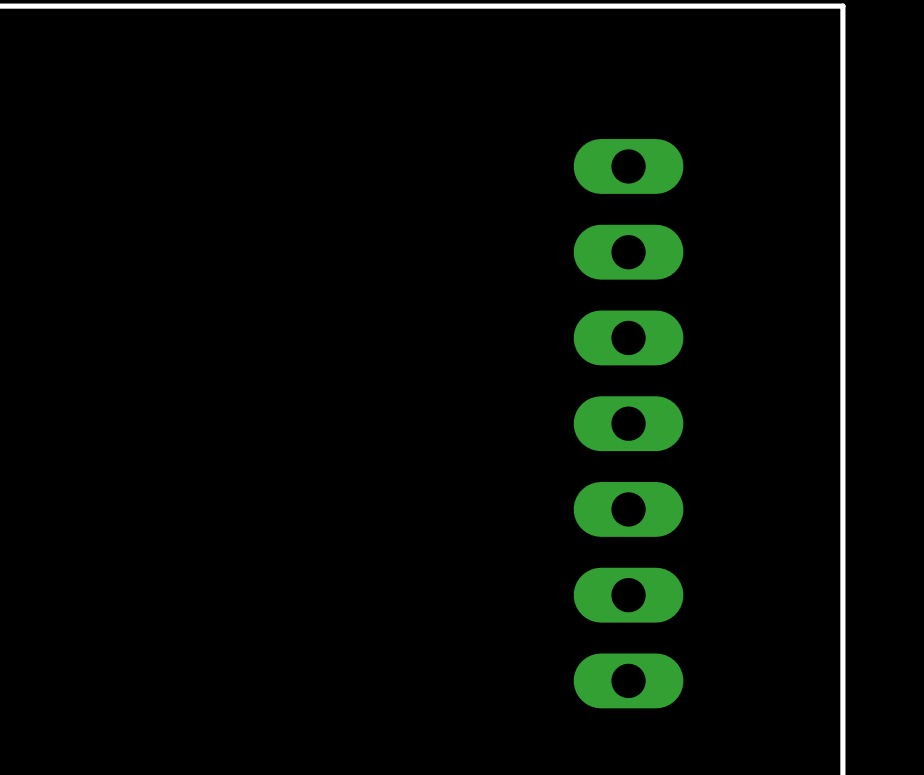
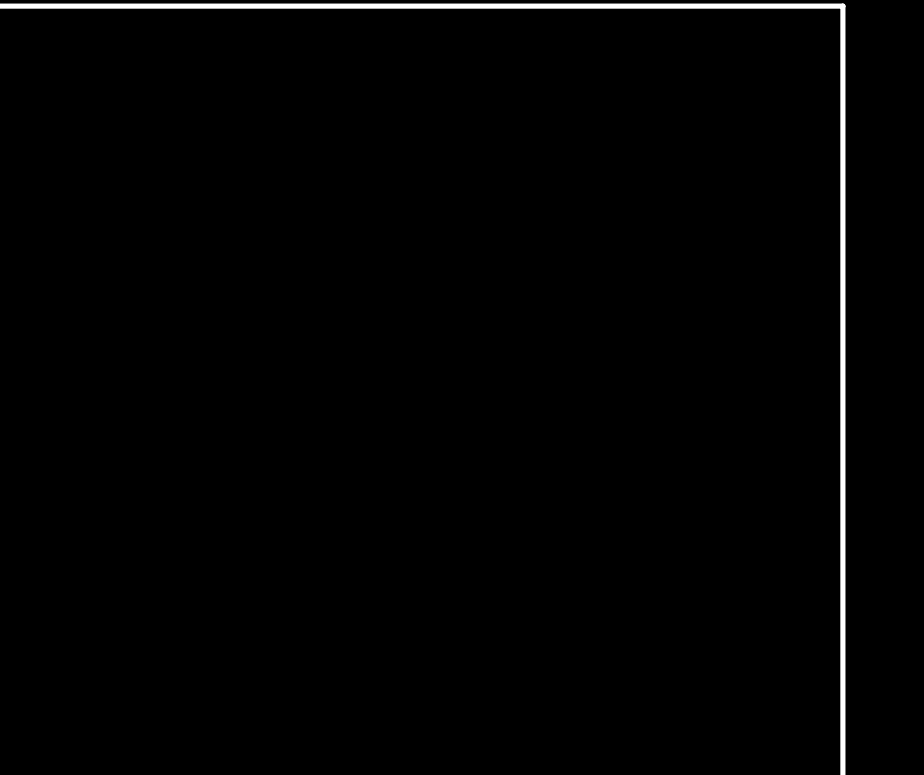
part: (628, 423) -> none

